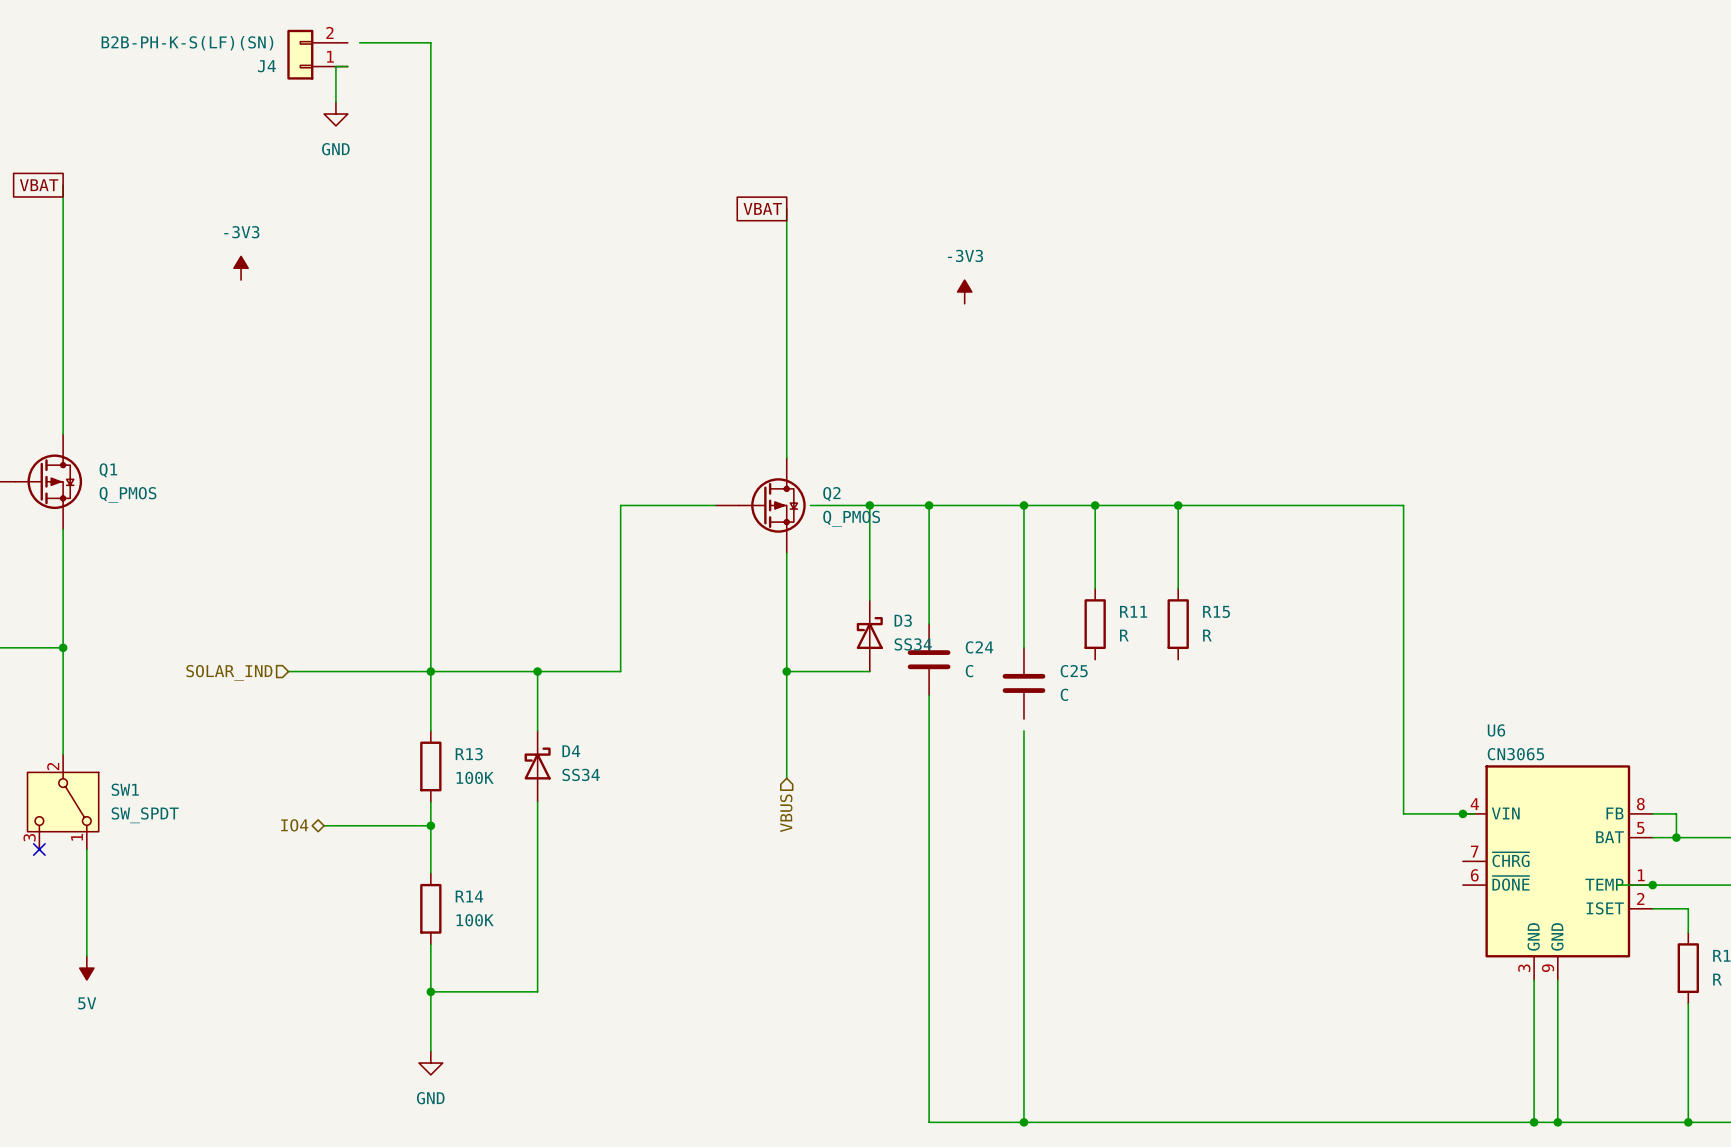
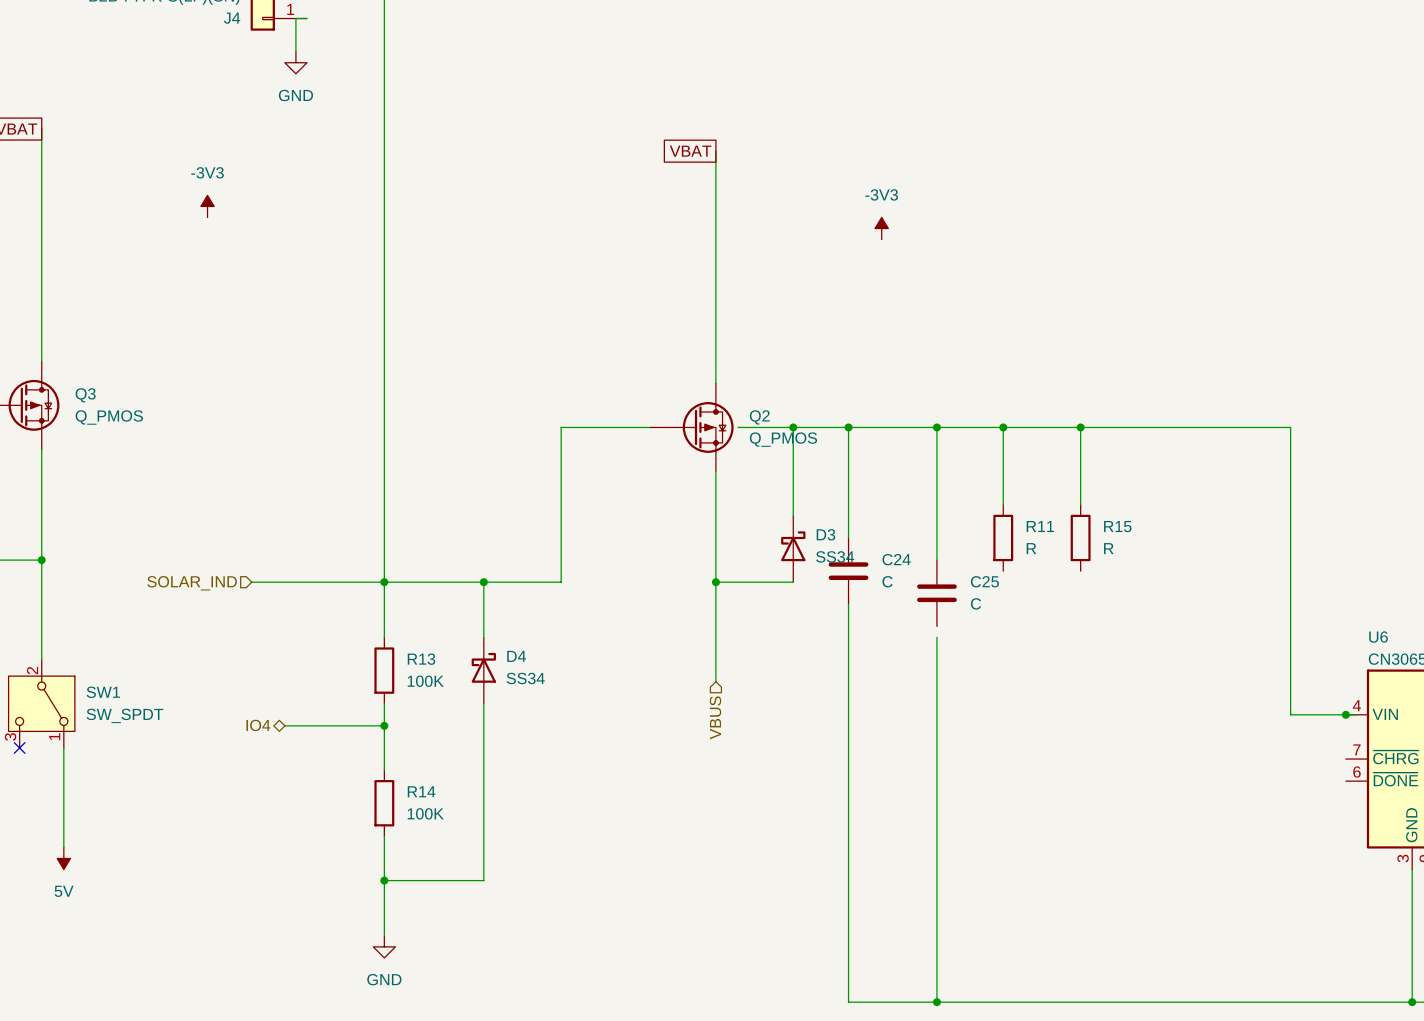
Q1 name: Q1 (108, 470) -> Q3 (85, 395)

